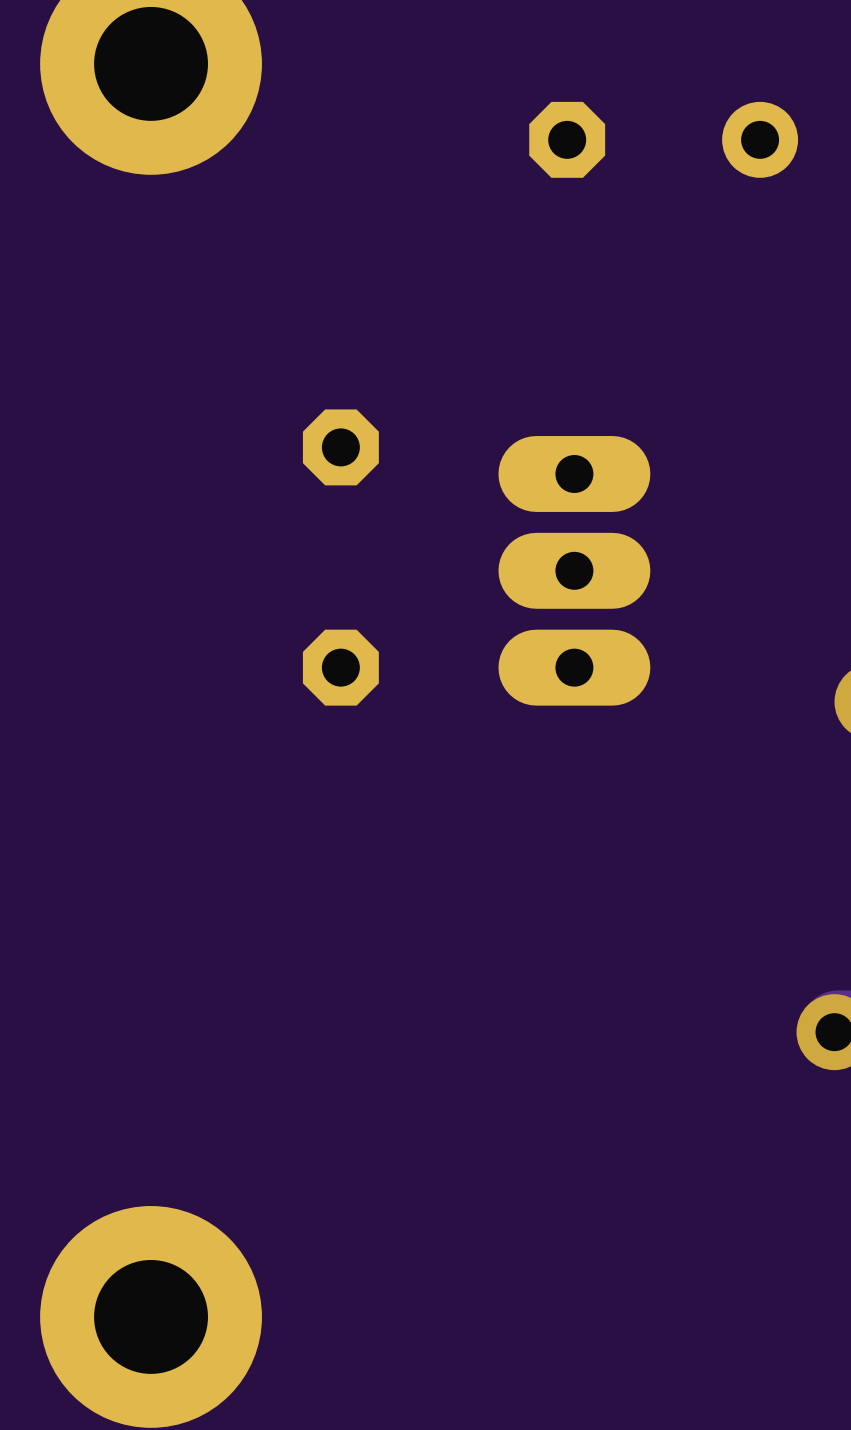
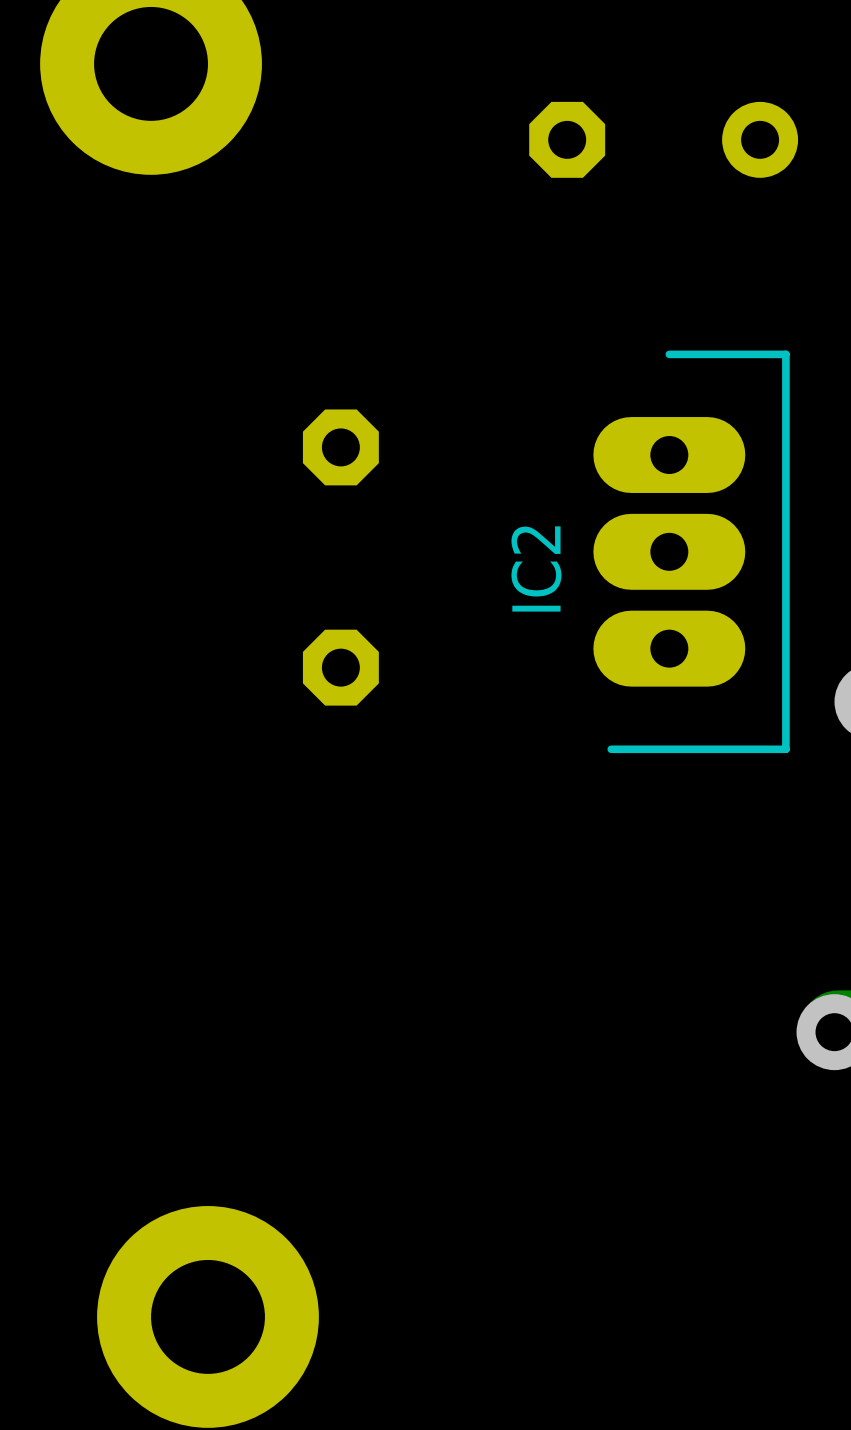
IC2 side: top (574, 570) -> bottom (691, 551)
part position: (151, 1316) -> (207, 1316)

